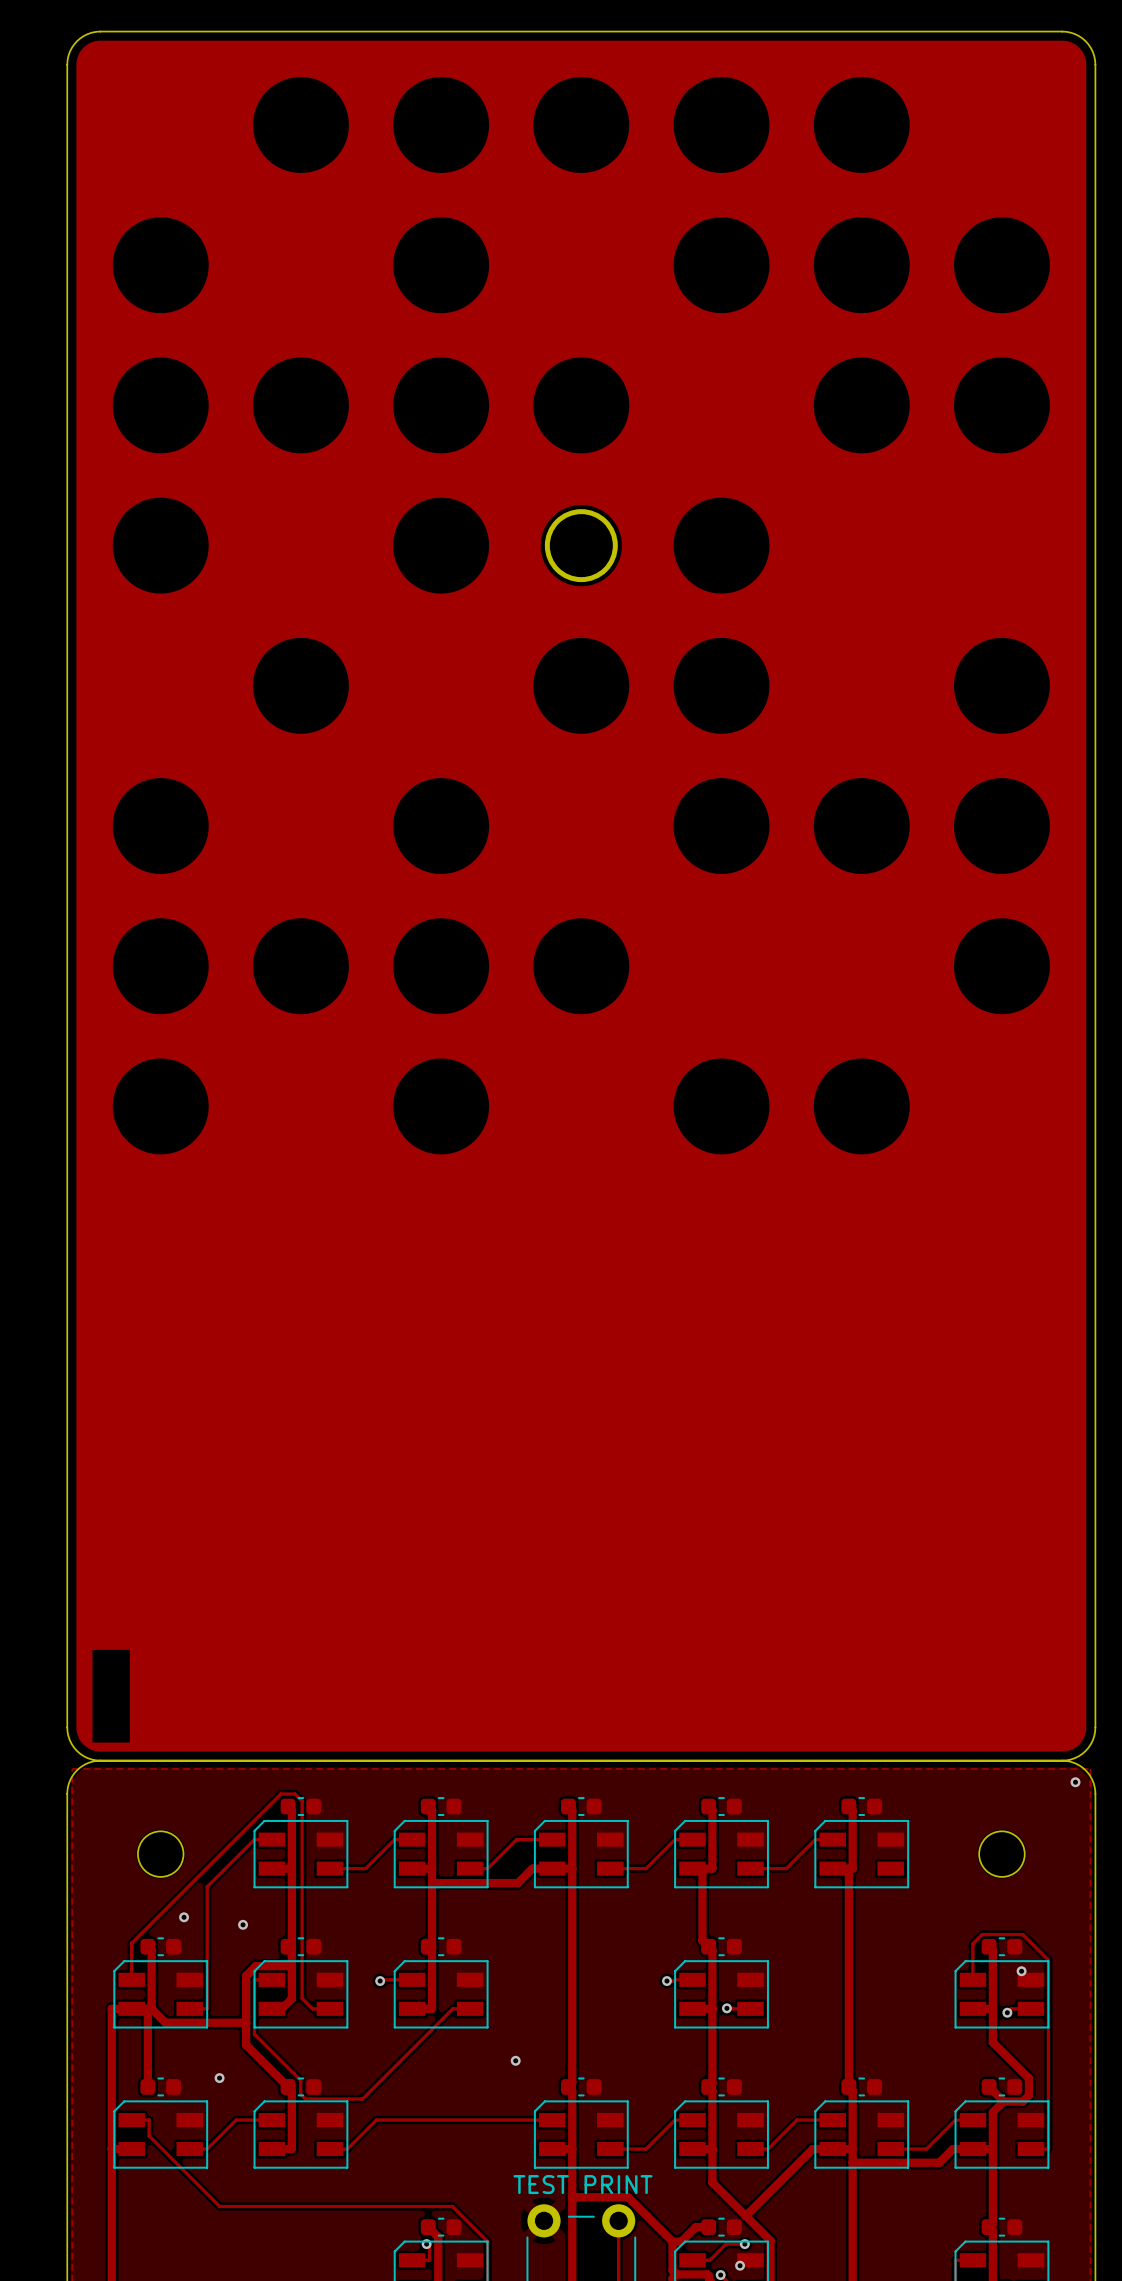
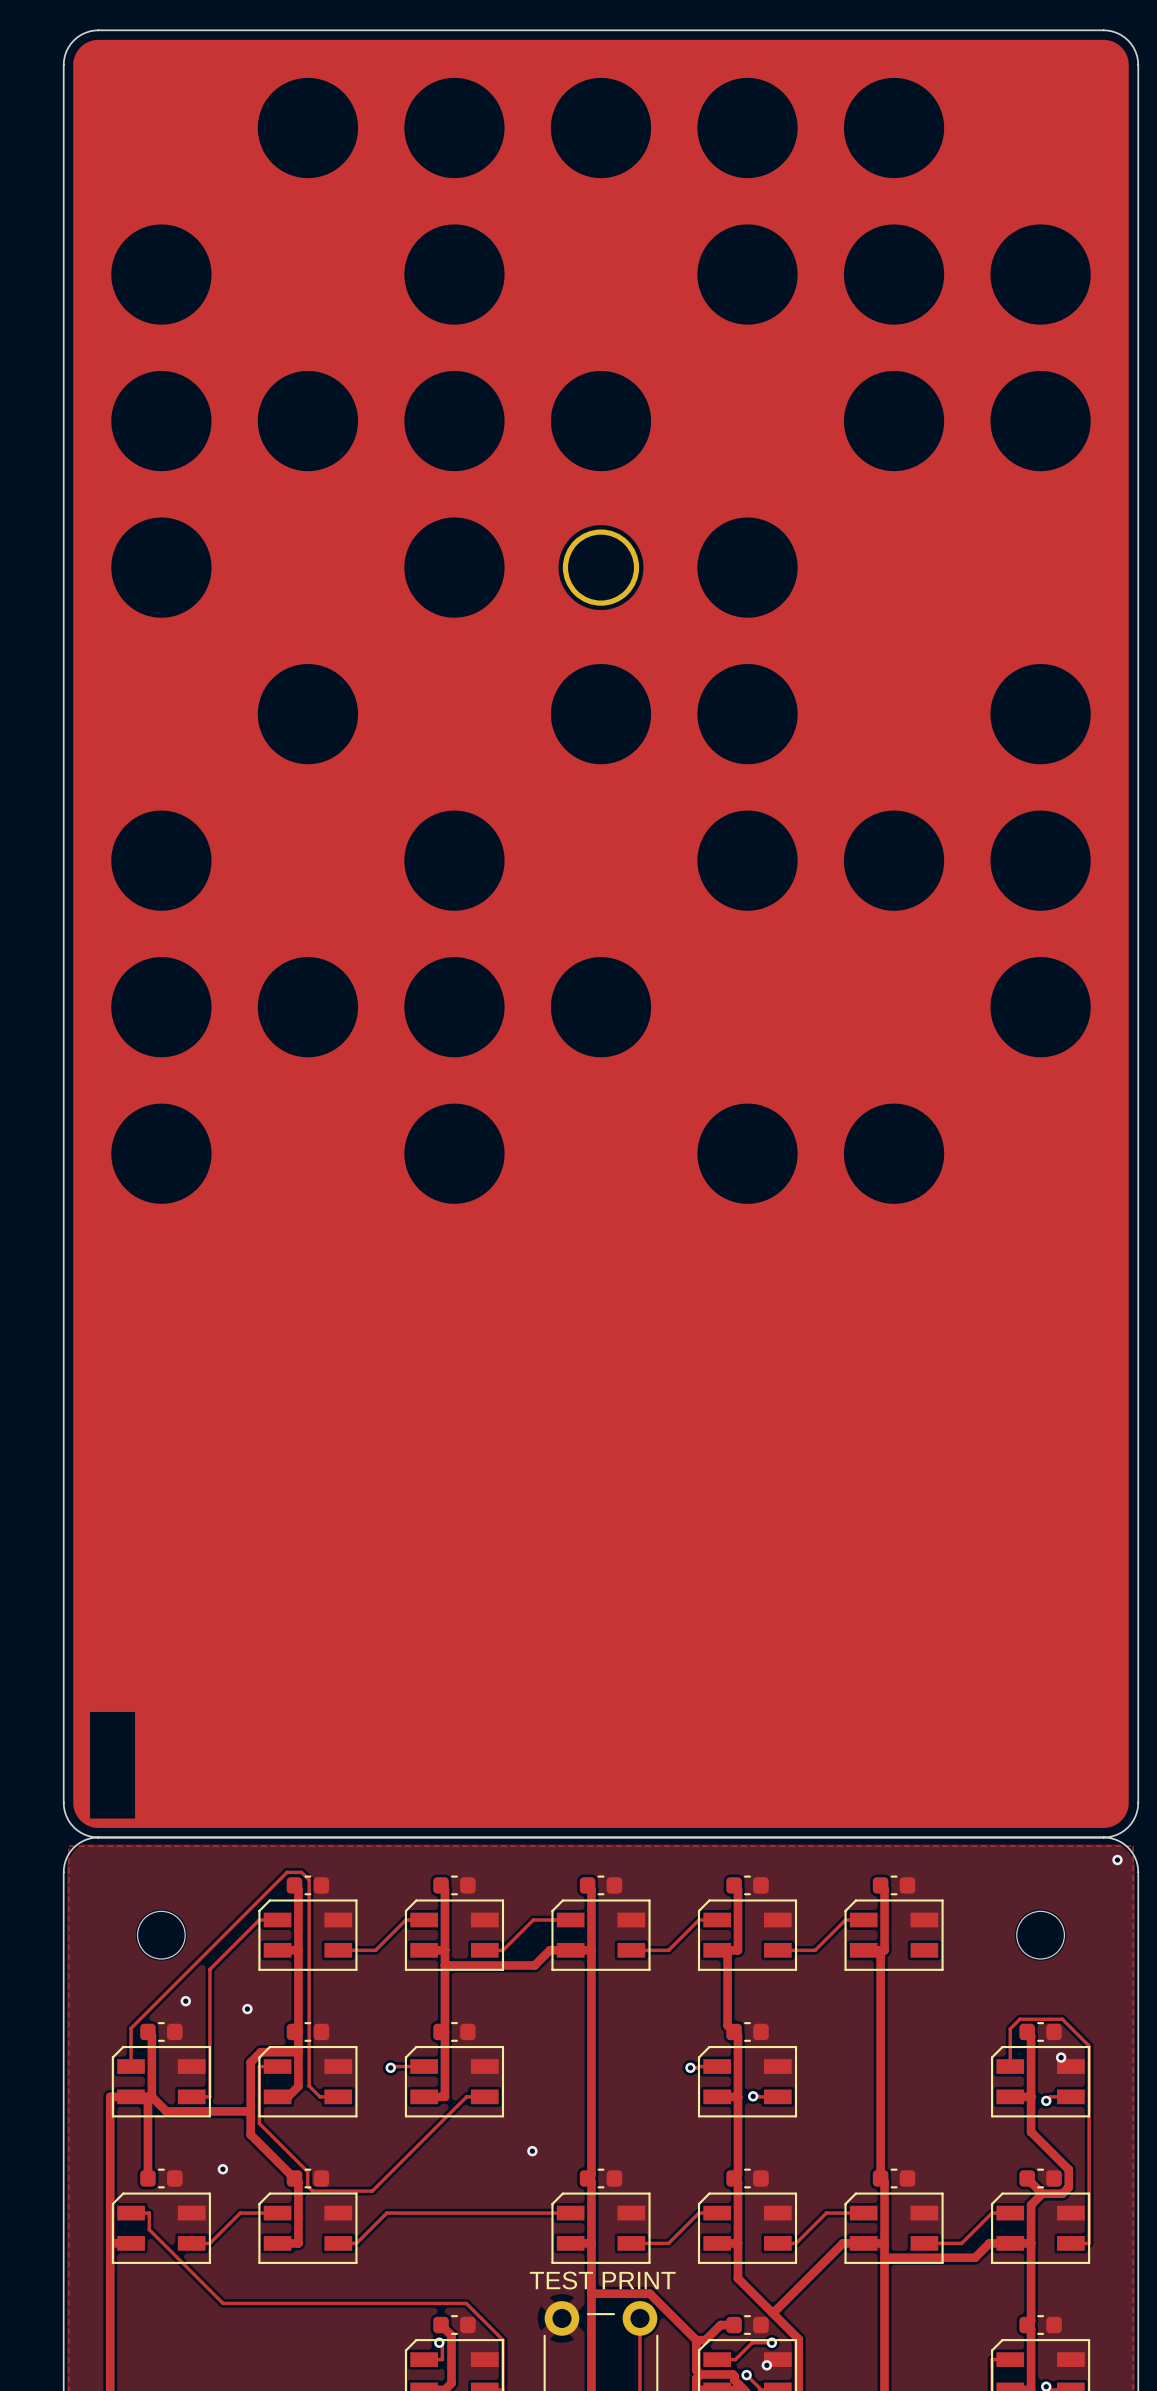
drawing shape: [76, 40, 1087, 1752] -> [73, 39, 1129, 1828]

